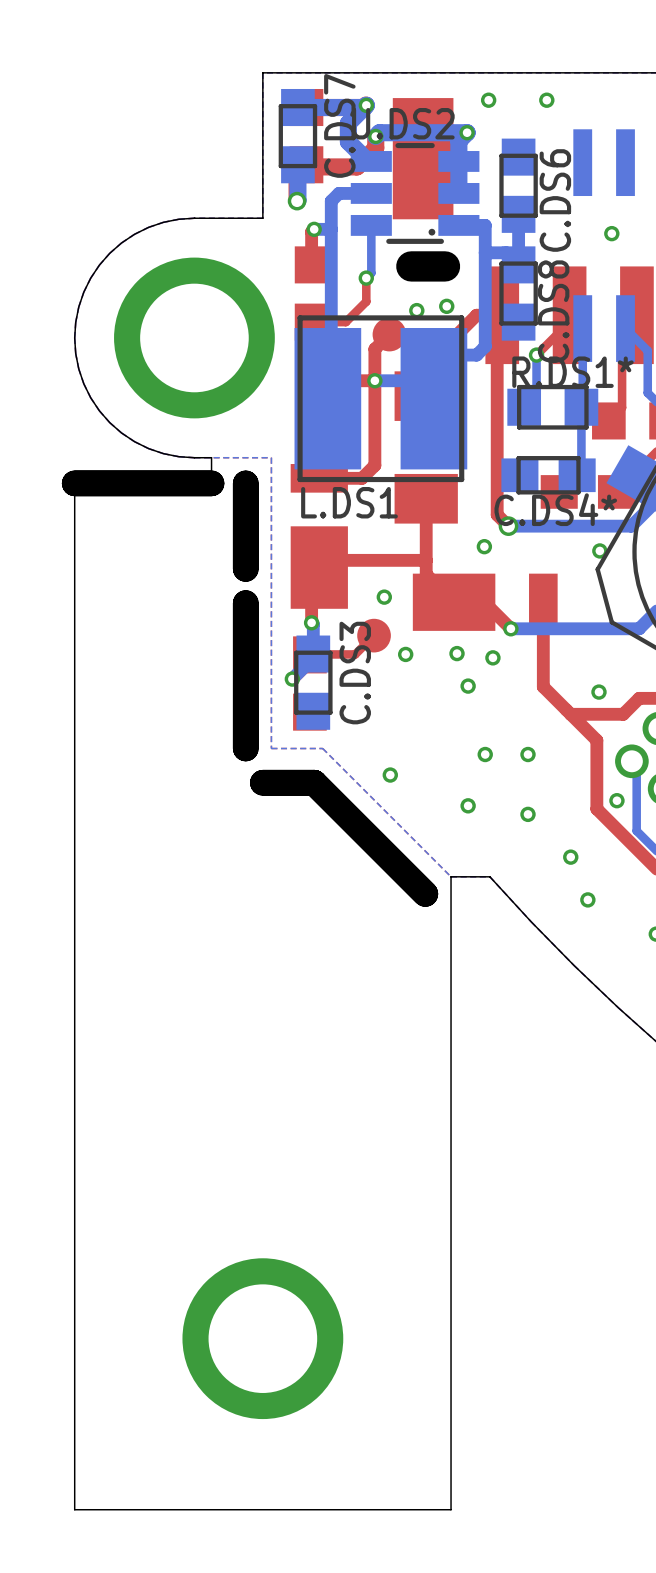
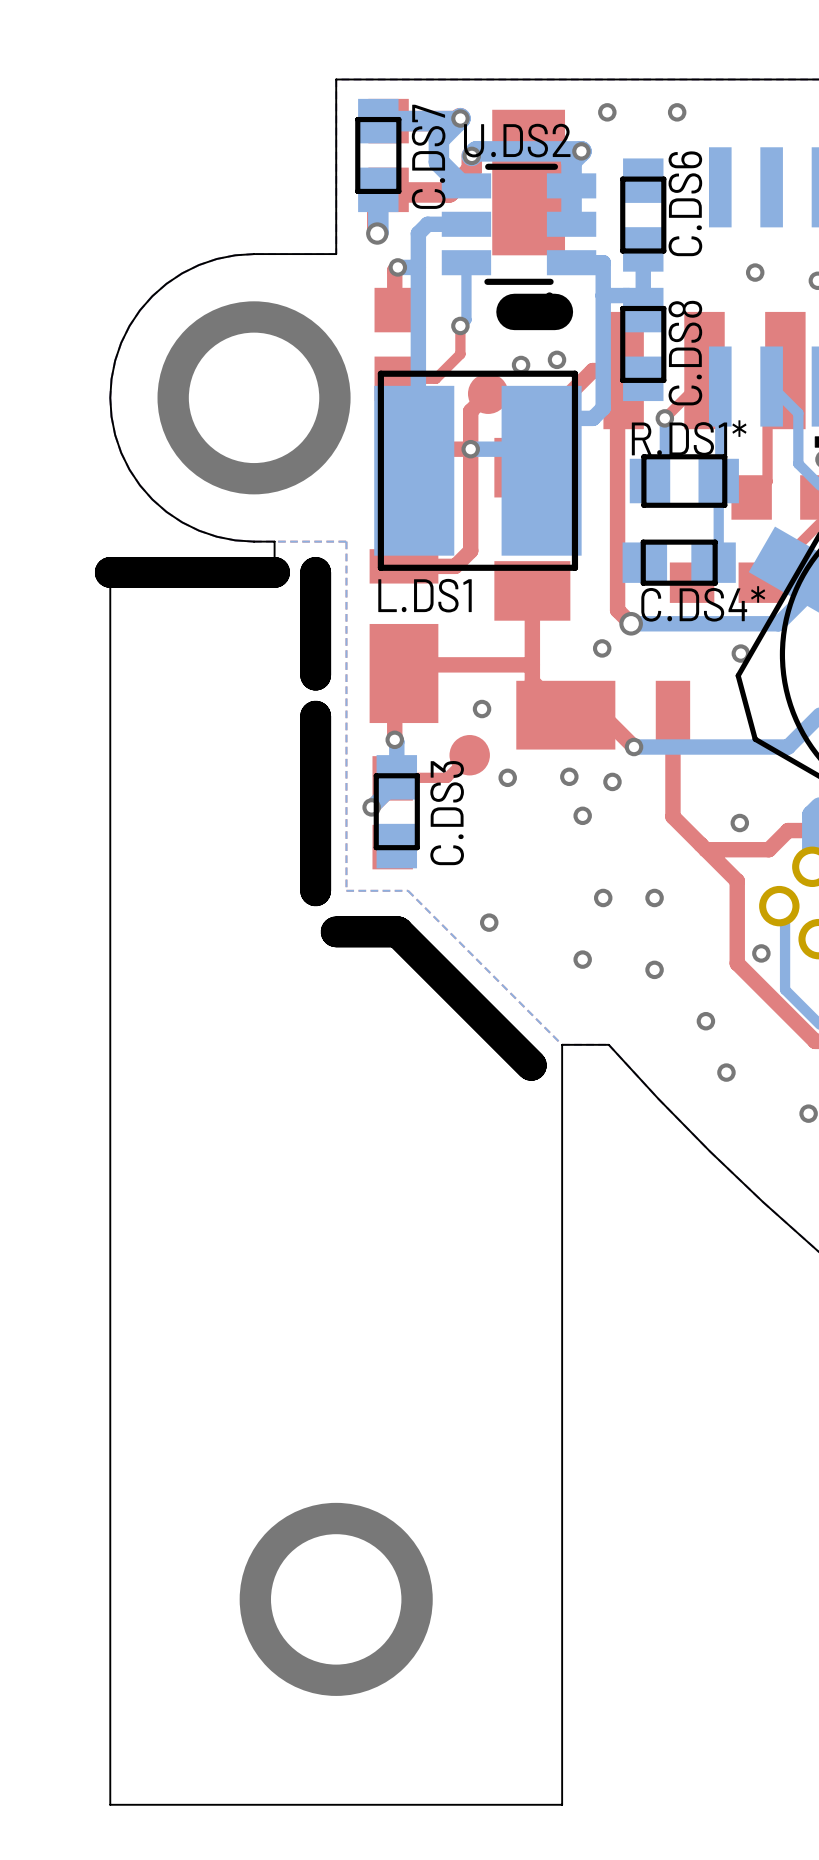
U.DS2 footprint: [350, 142, 480, 244] -> [441, 163, 597, 301]
C.DS6 name position: C.DS6 (555, 200) -> C.DS6 (685, 203)

